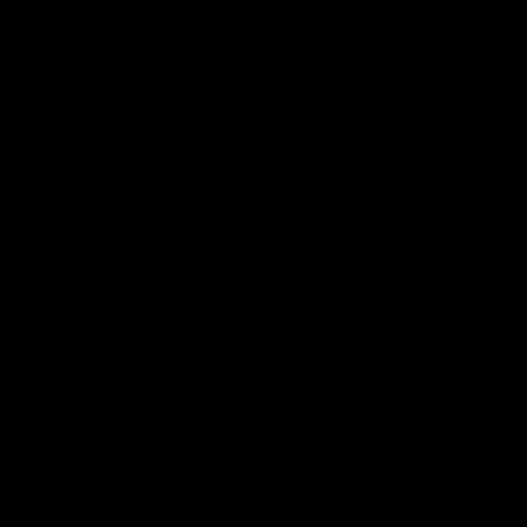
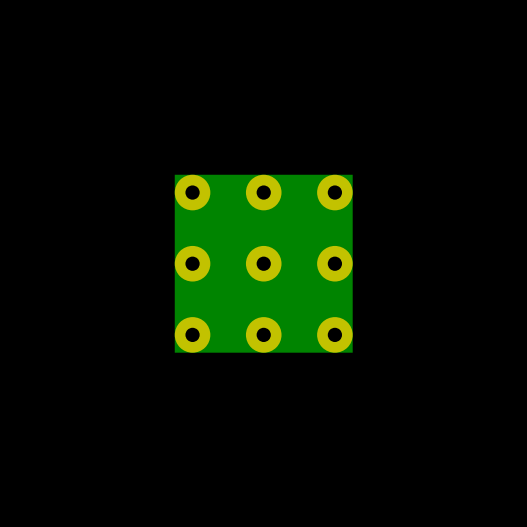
part: none -> (263, 263)

